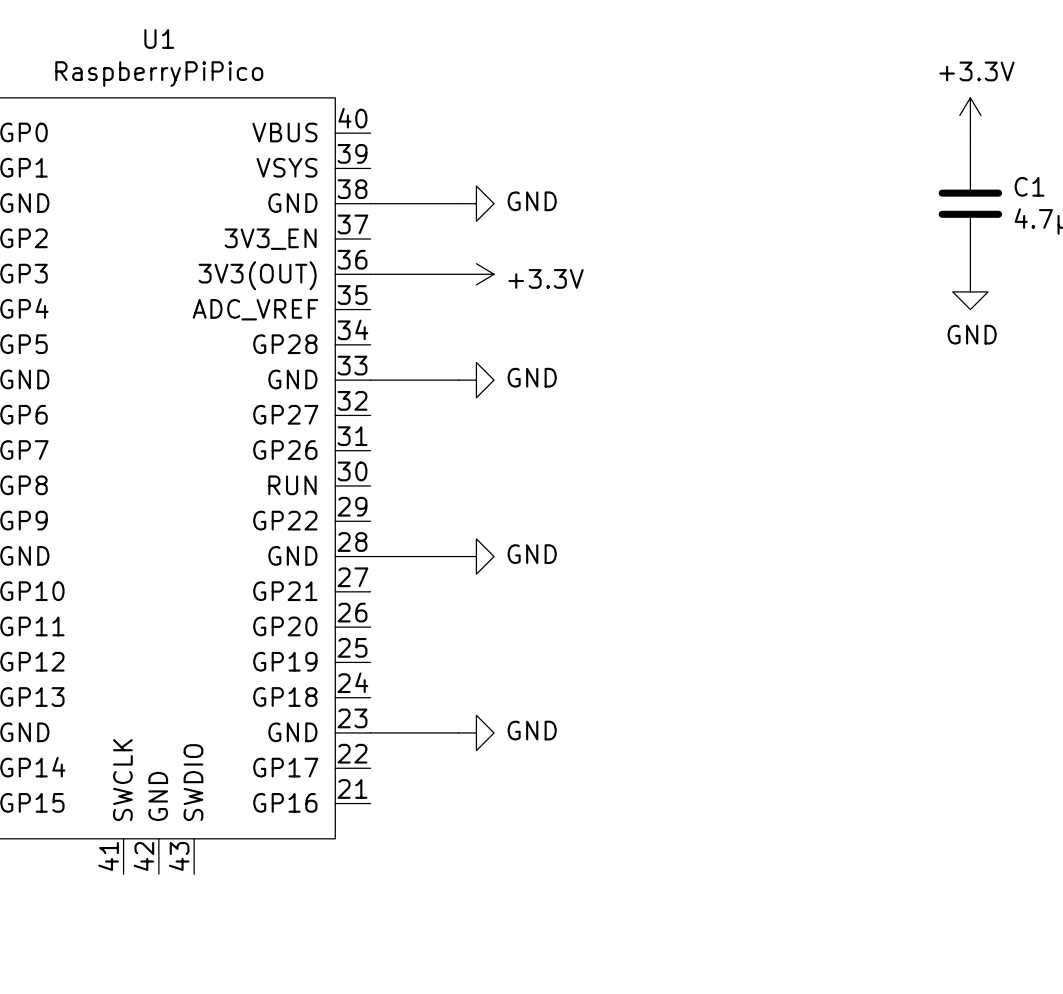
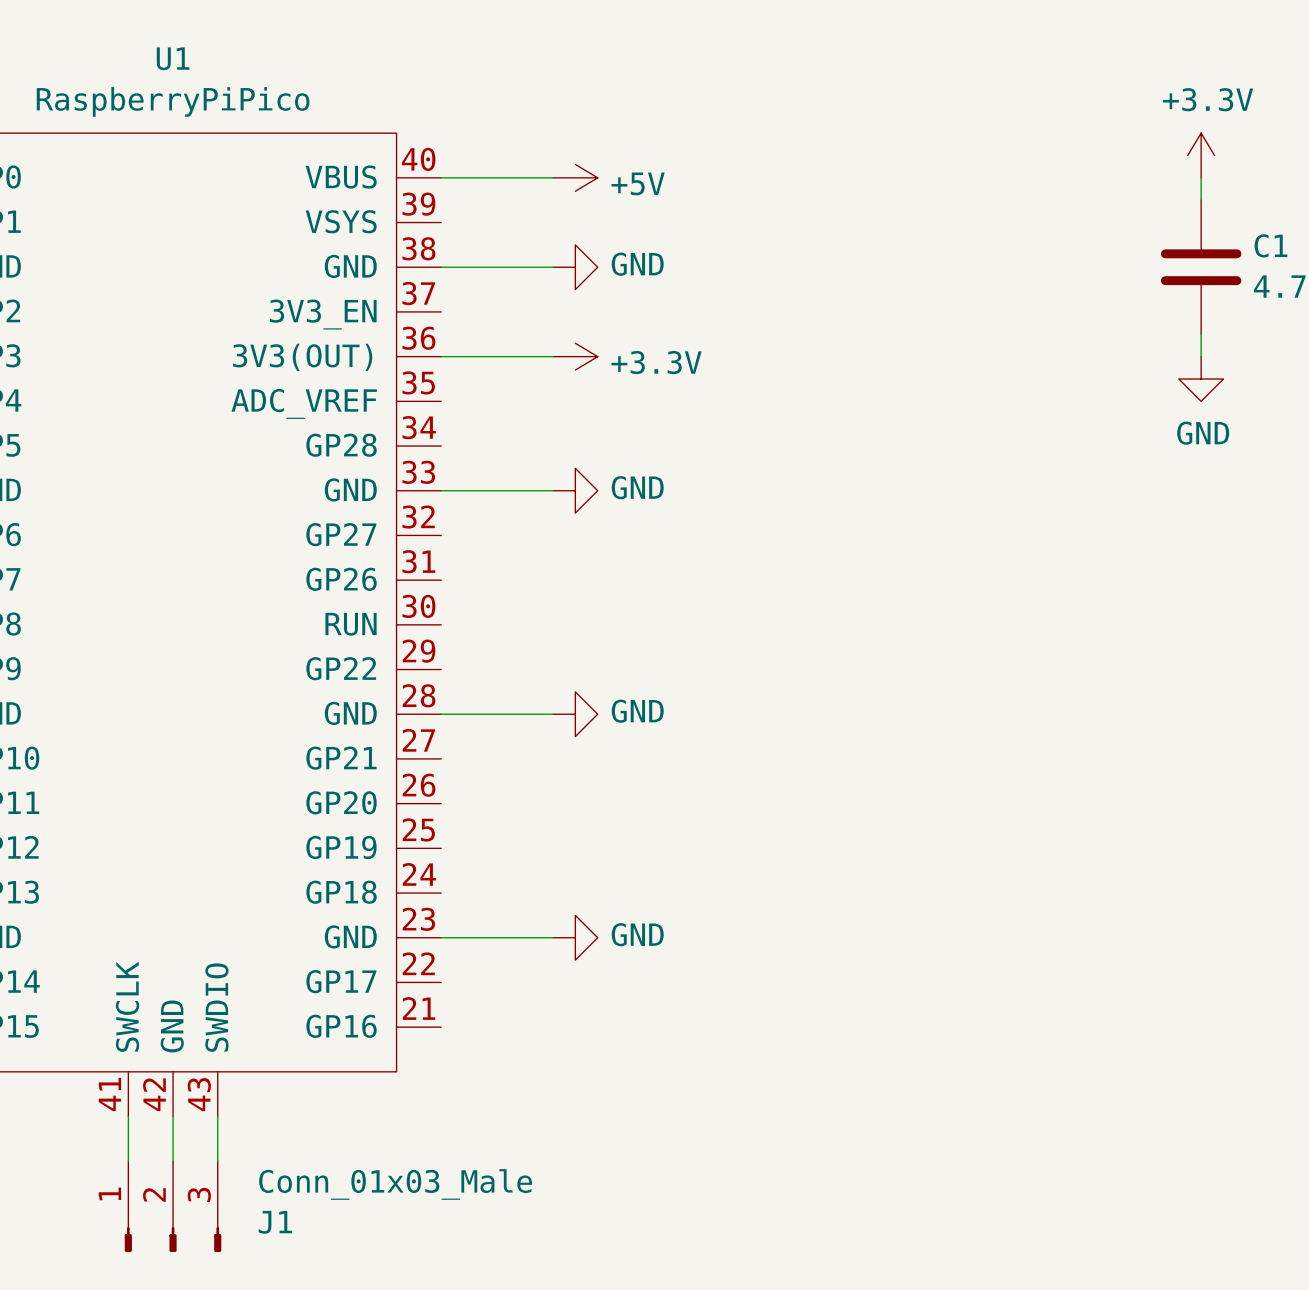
wire: none -> (441, 177) (552, 177)
power symbol: none -> +5V (575, 177)
wire: none -> (128, 1116) (128, 1161)
wire: none -> (173, 1116) (173, 1161)
wire: none -> (217, 1116) (217, 1161)
J1: none -> Conn_01x03_Male (173, 1206)

